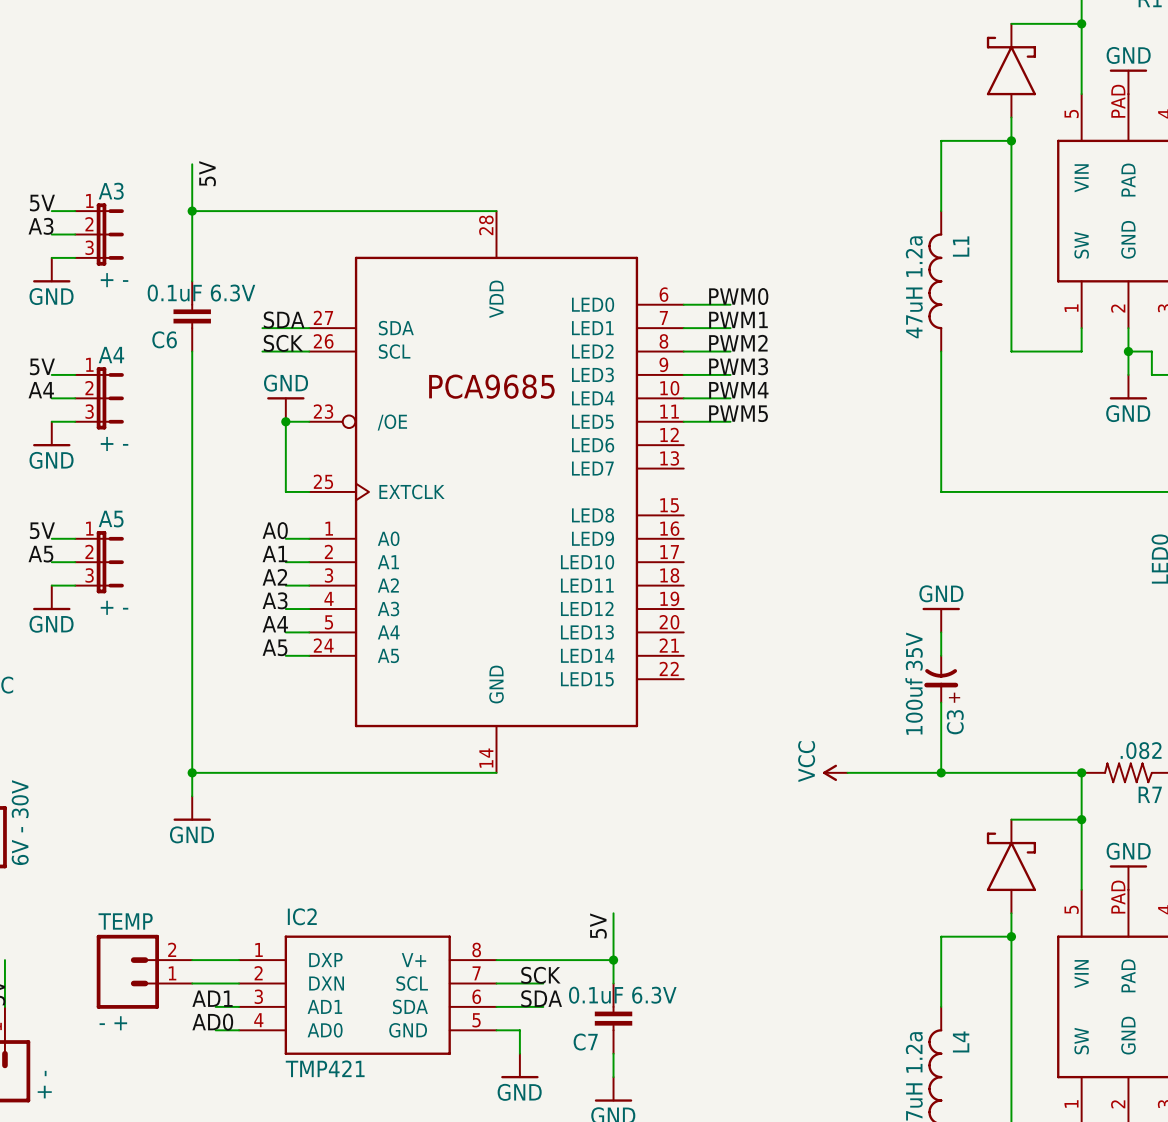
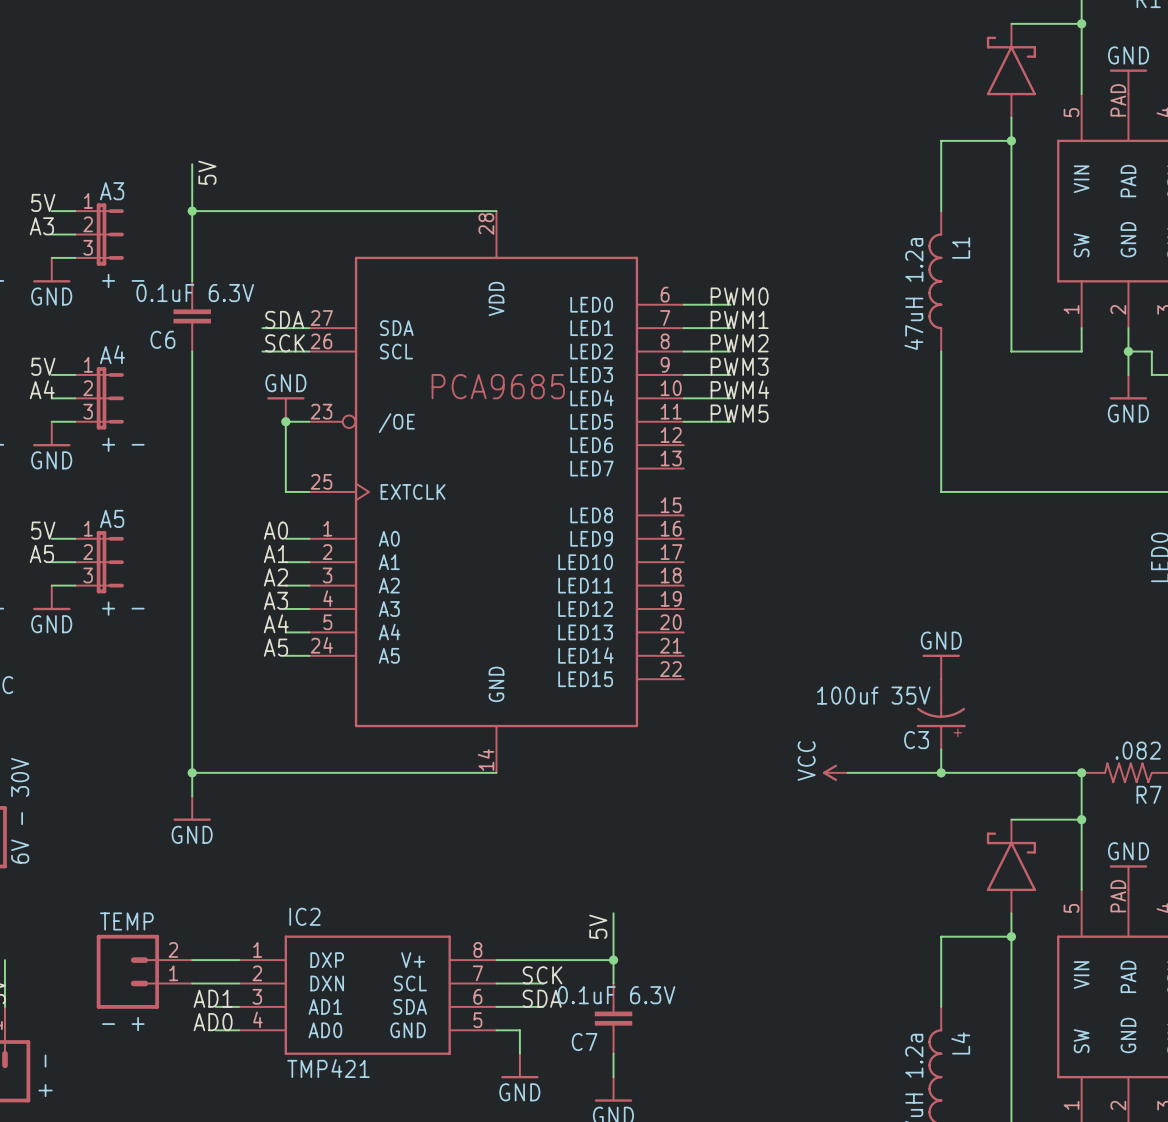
power symbol position: GND (941, 620) -> GND (941, 666)
wire: (941, 632) (941, 655) -> none
C3 symbol: [924, 655, 959, 704] -> [916, 679, 966, 750]
C3 value position: 100uf 35V (914, 683) -> 100uf 35V (873, 695)
C3 name position: C3 (955, 722) -> C3 (916, 740)

